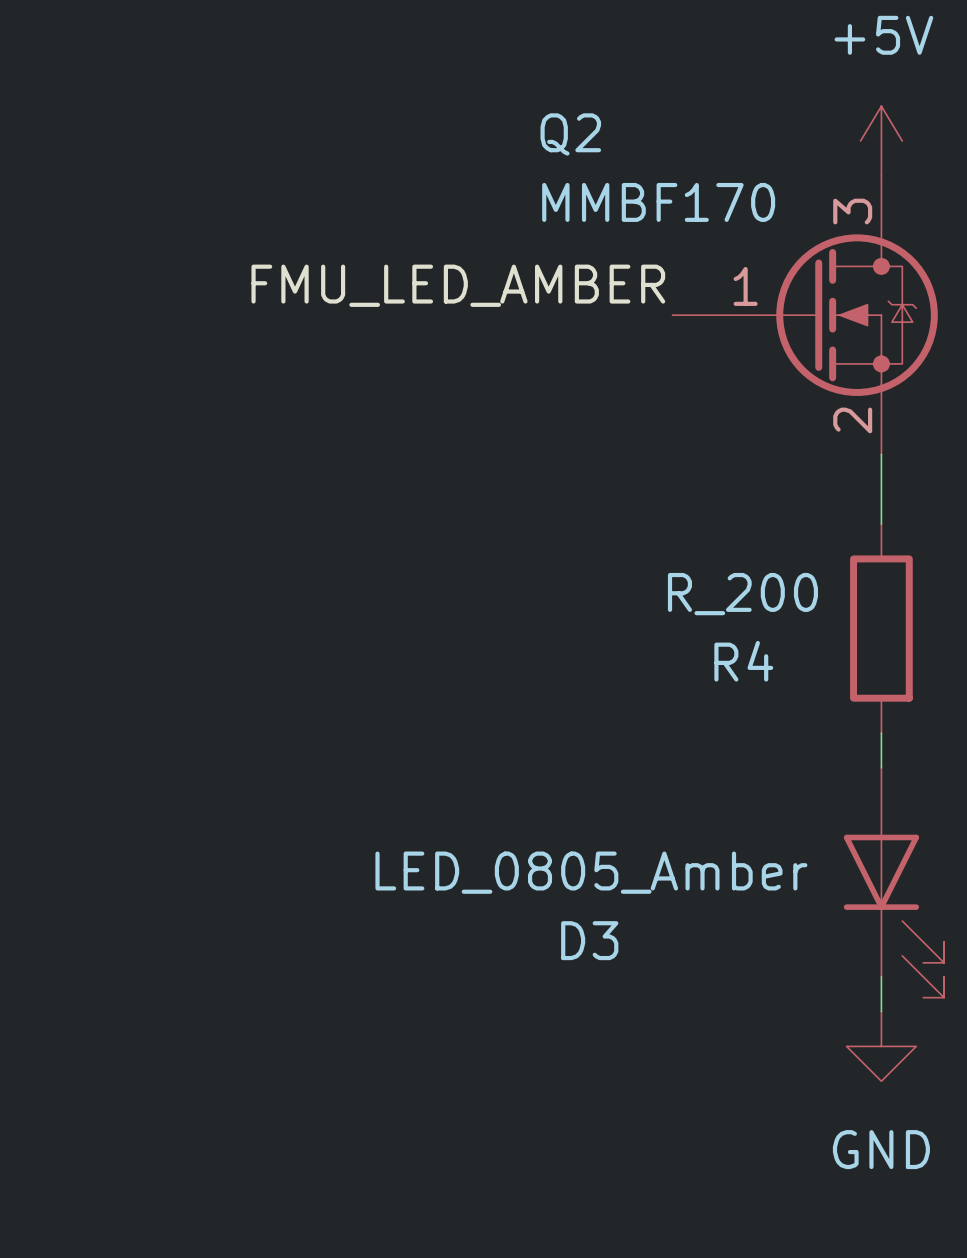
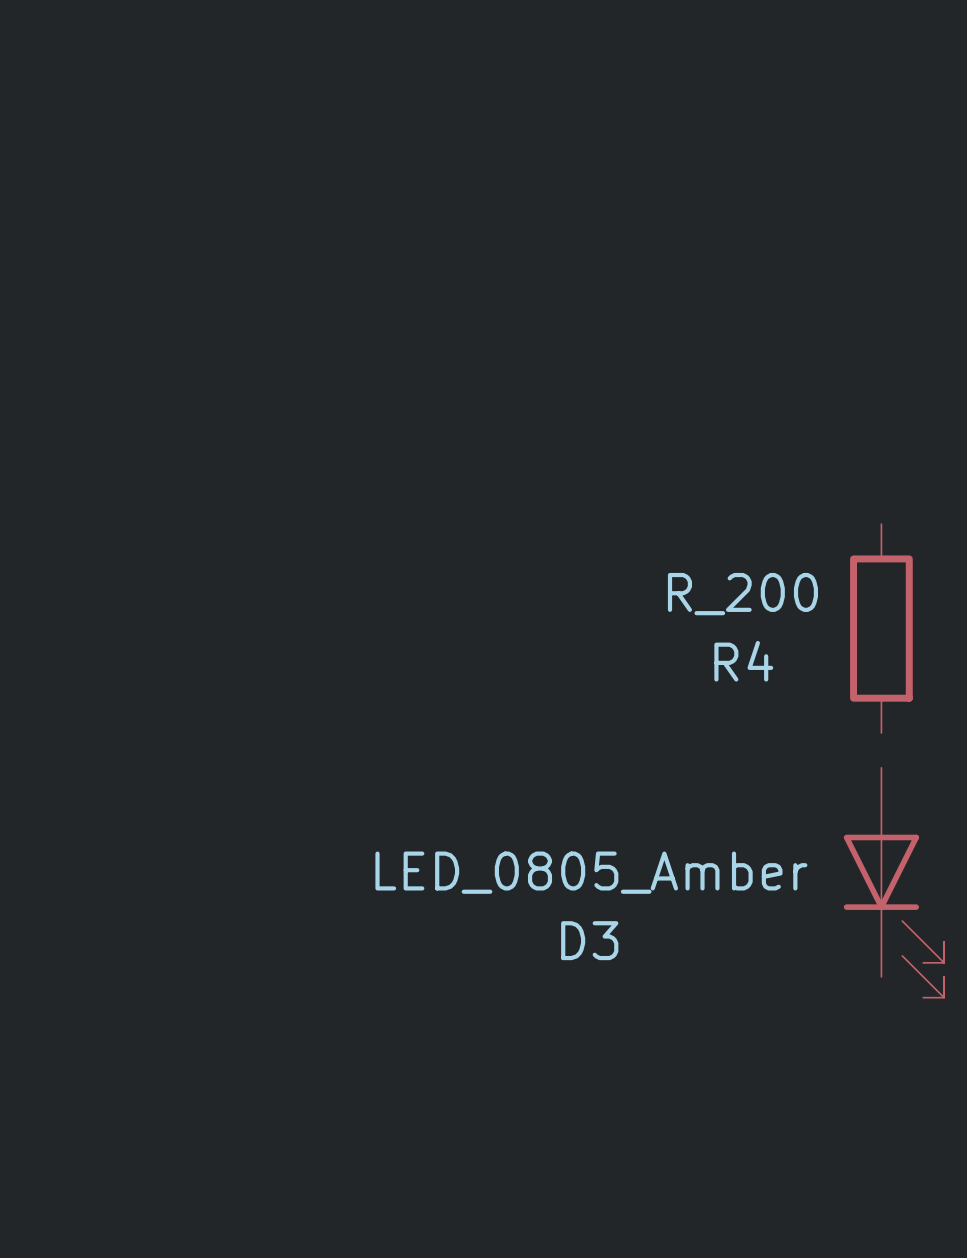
power symbol: +5V (881, 141) -> none
label: FMU_LED_AMBER (458, 285) -> none
Q2: MMBF170 (805, 315) -> none
wire: (881, 454) (881, 524) -> none
wire: (881, 733) (881, 767) -> none
wire: (881, 976) (881, 1011) -> none
power symbol: GND (881, 1046) -> none

